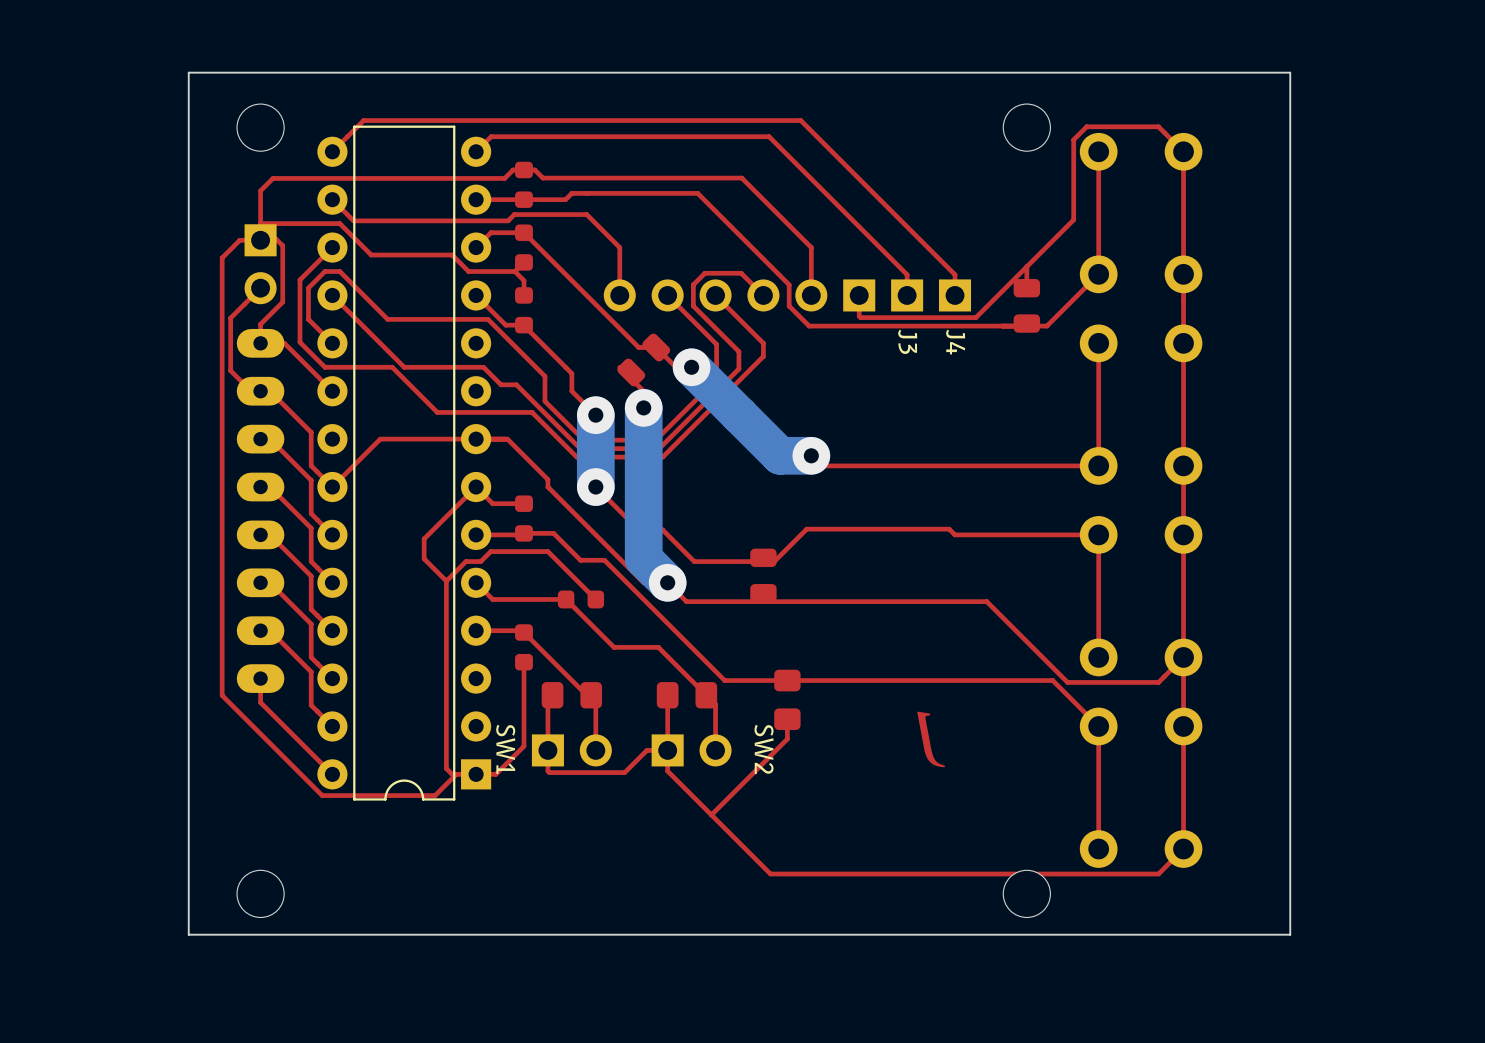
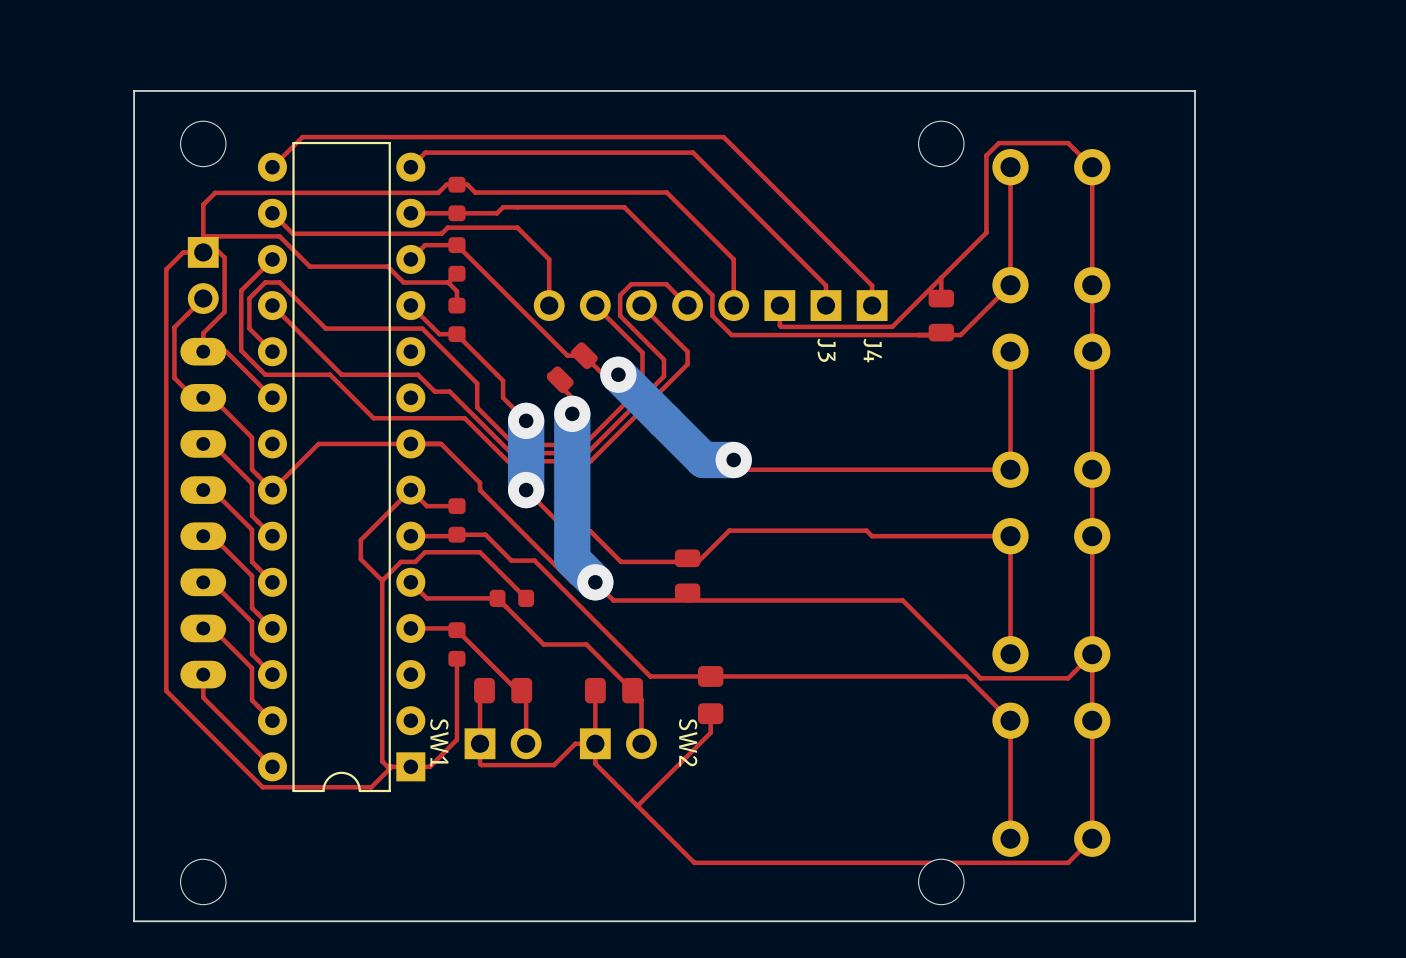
drawing: [840, 711, 974, 797] -> none

